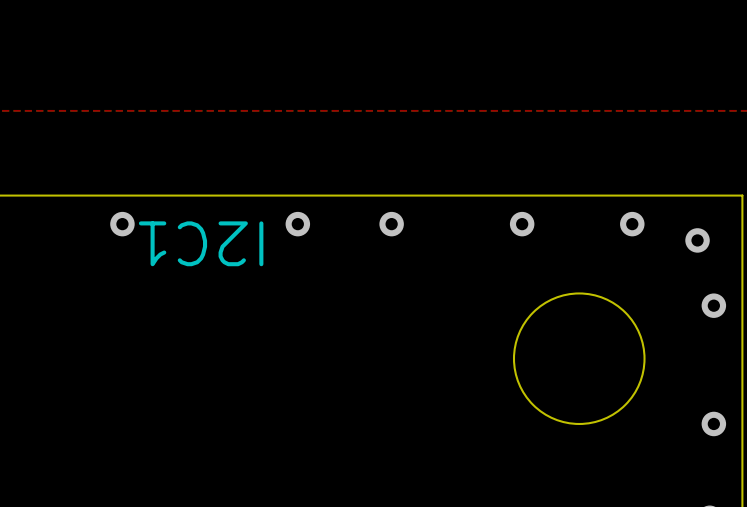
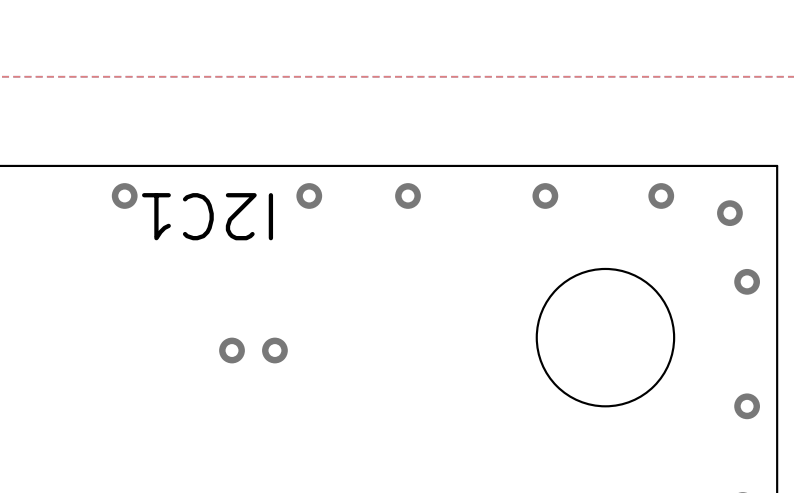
via: none -> (232, 350)
via: none -> (274, 350)

